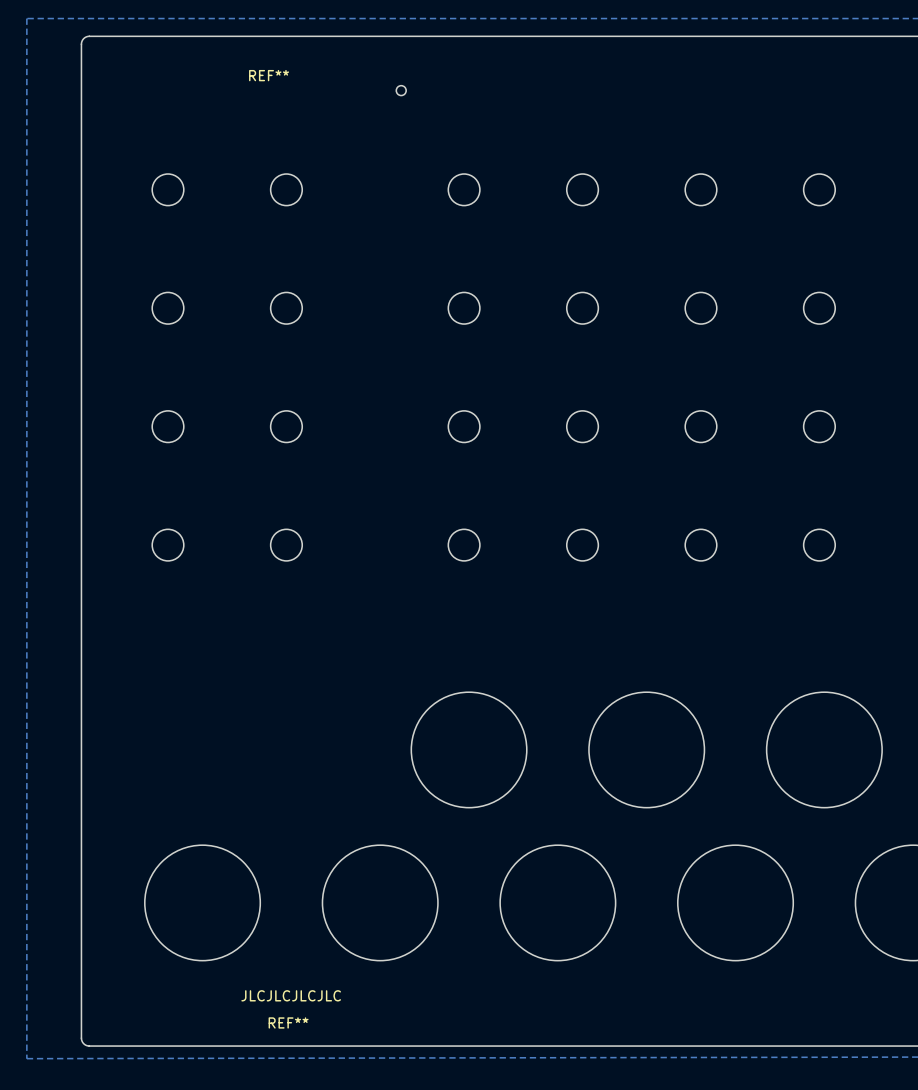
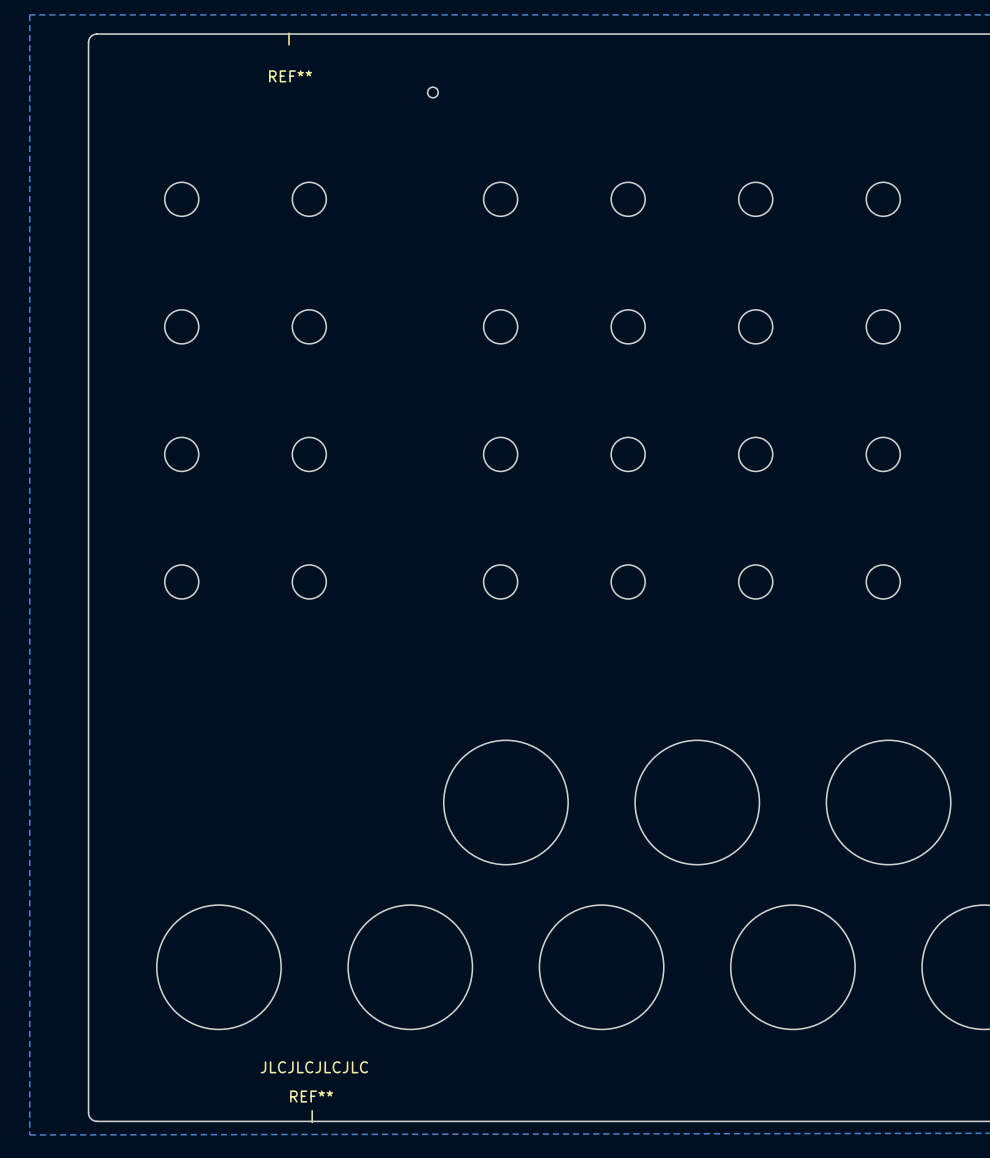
REF**: none -> (289, 39)
REF**: none -> (312, 1116)

